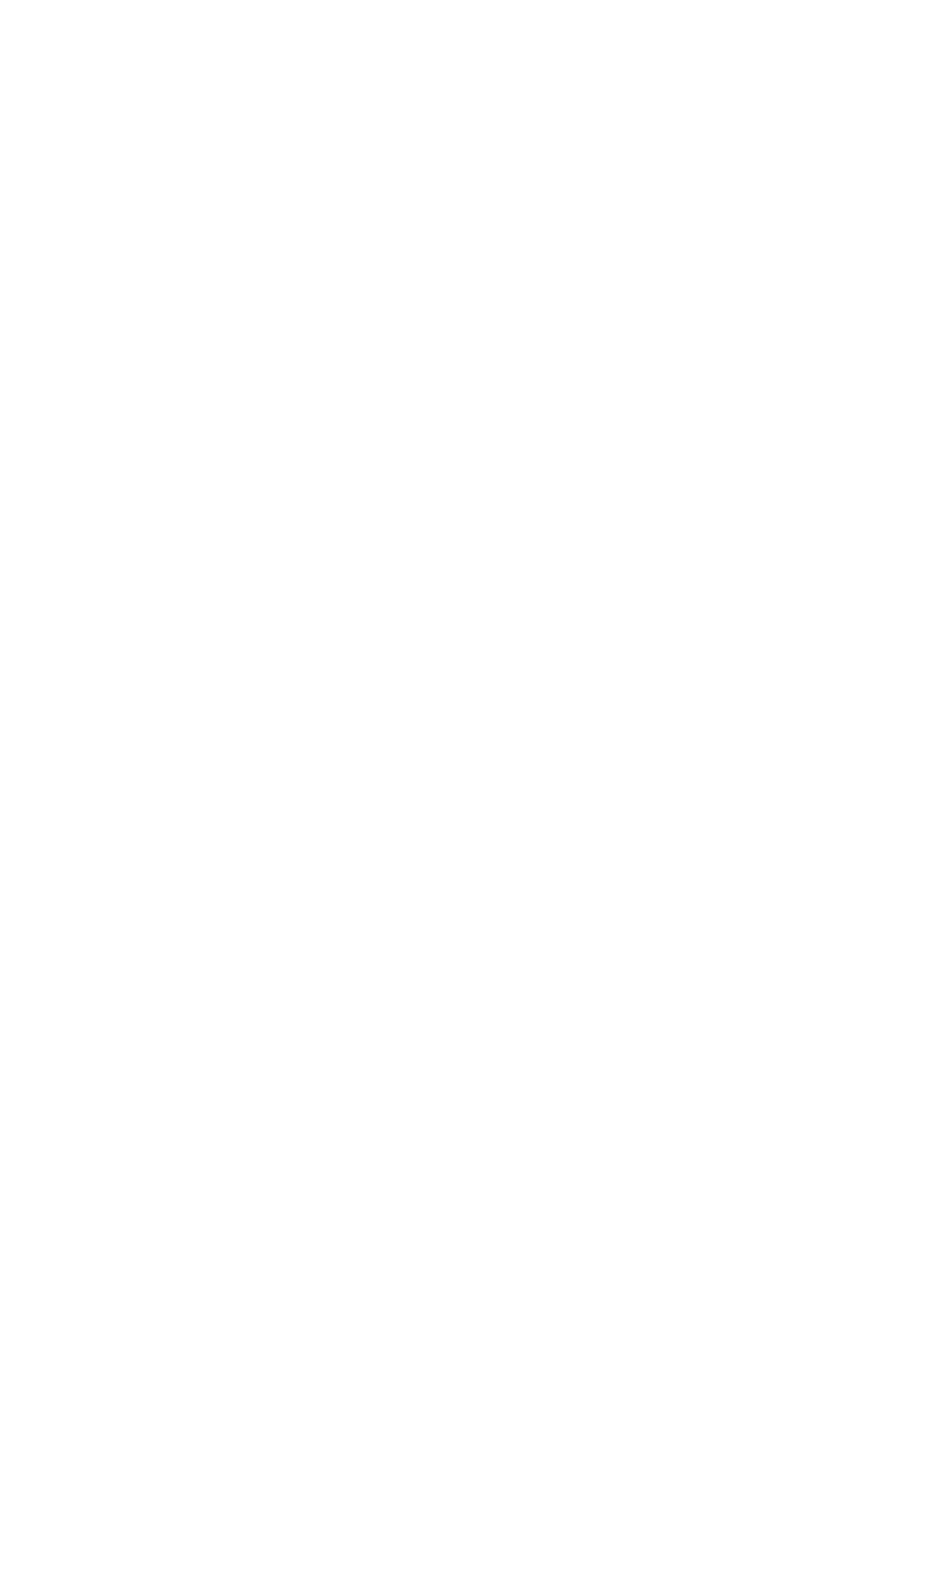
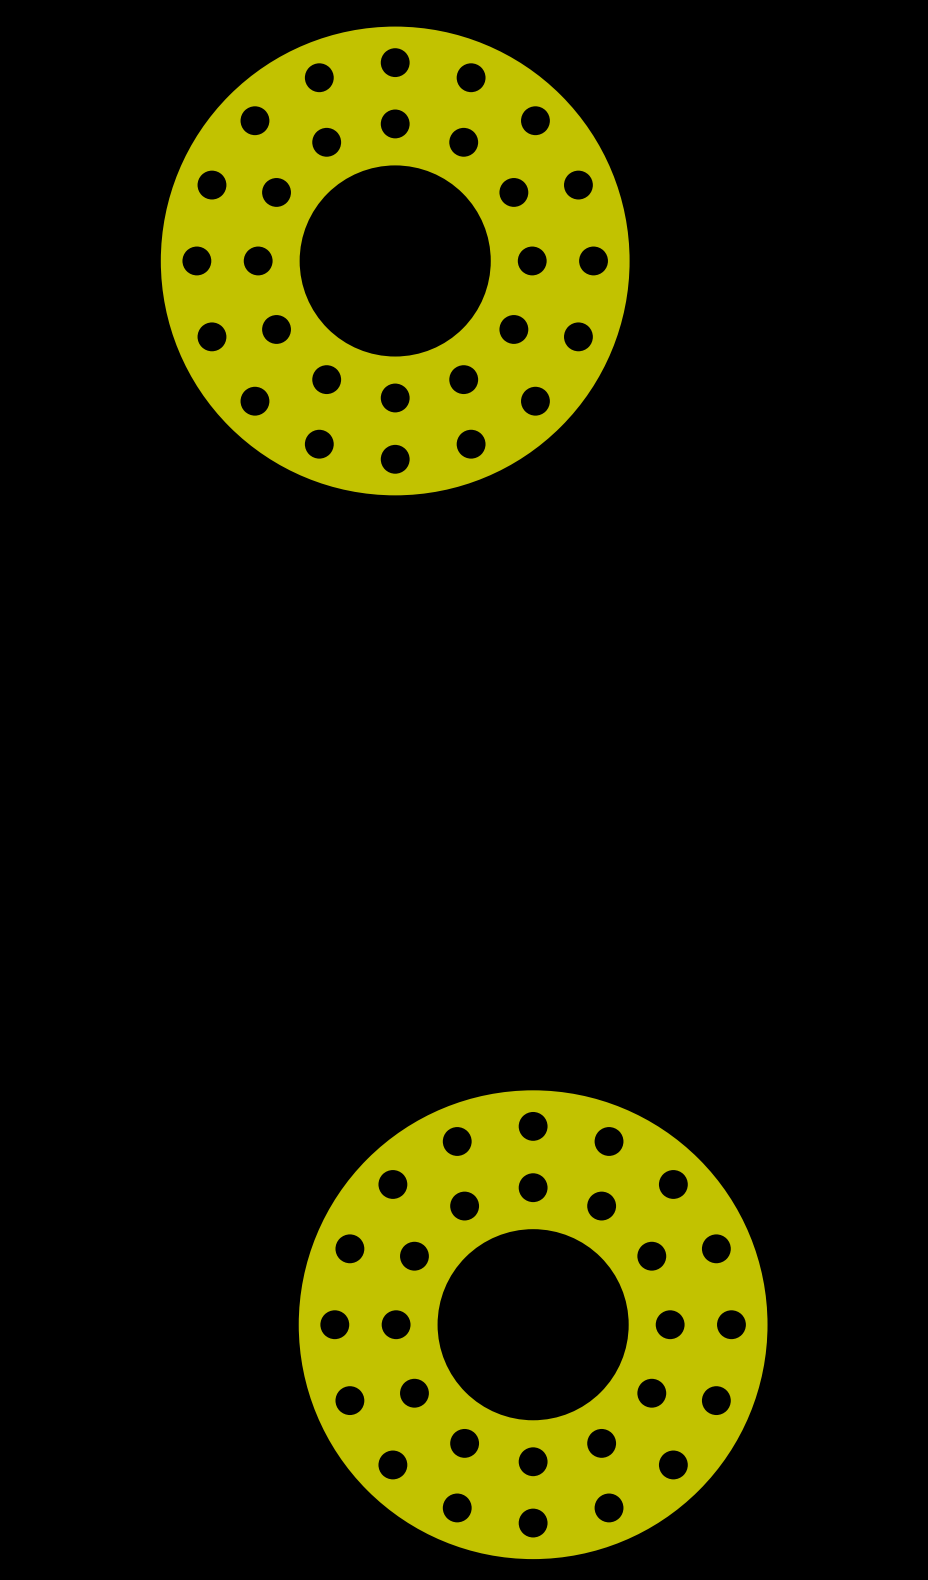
part: none -> (395, 260)
part: none -> (533, 1324)

